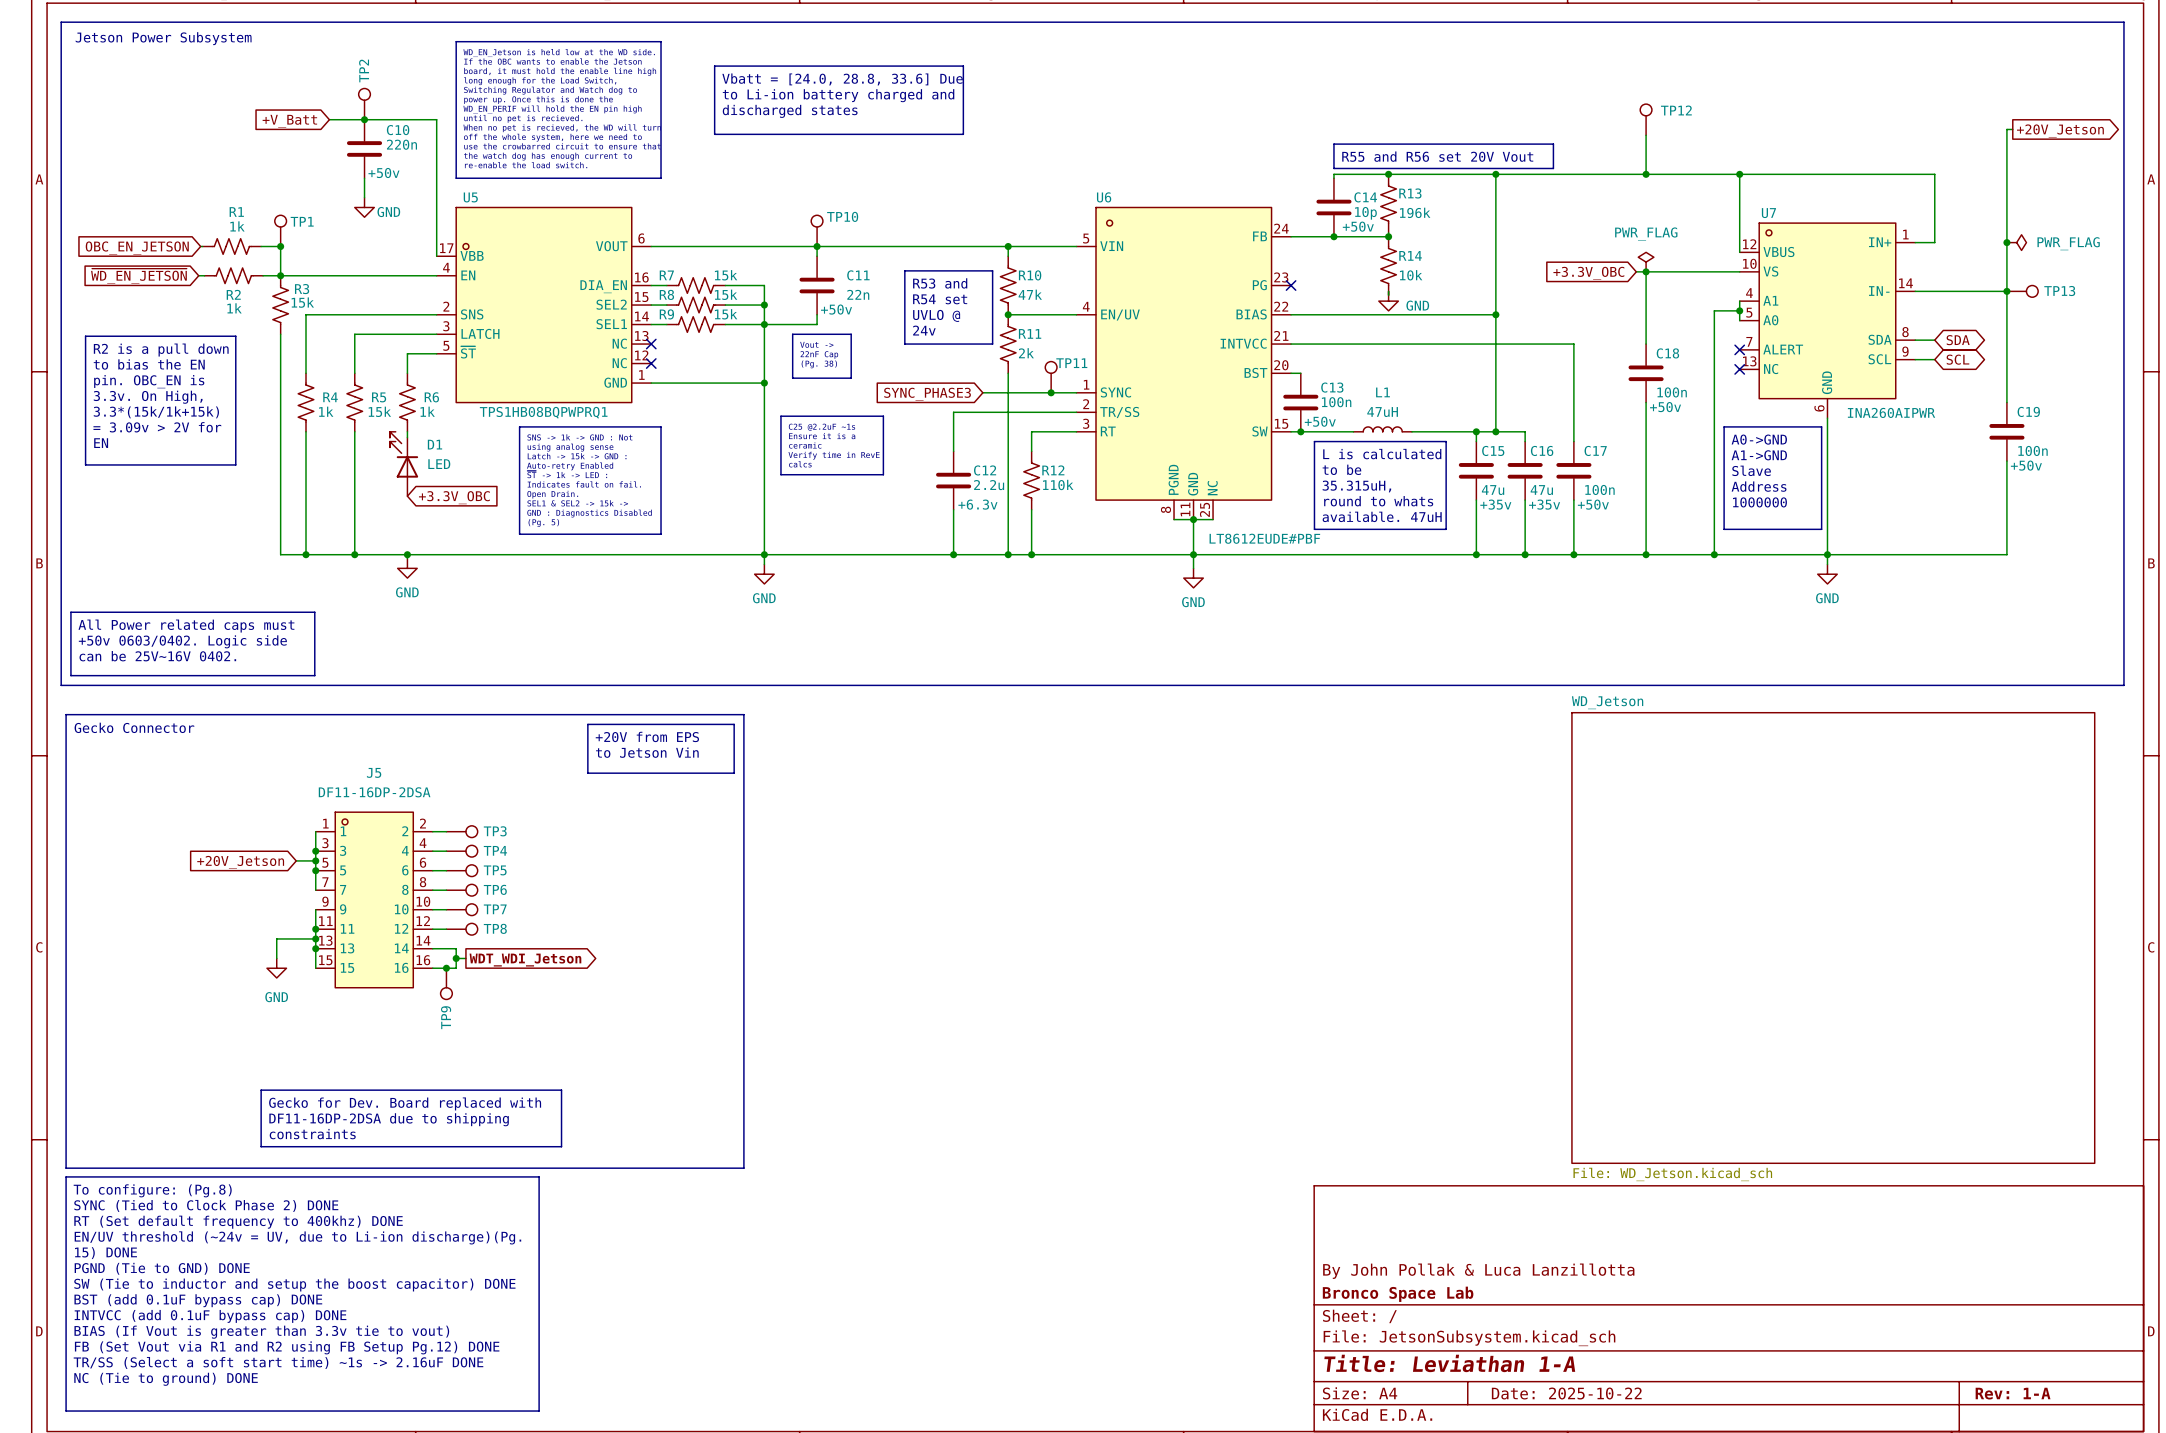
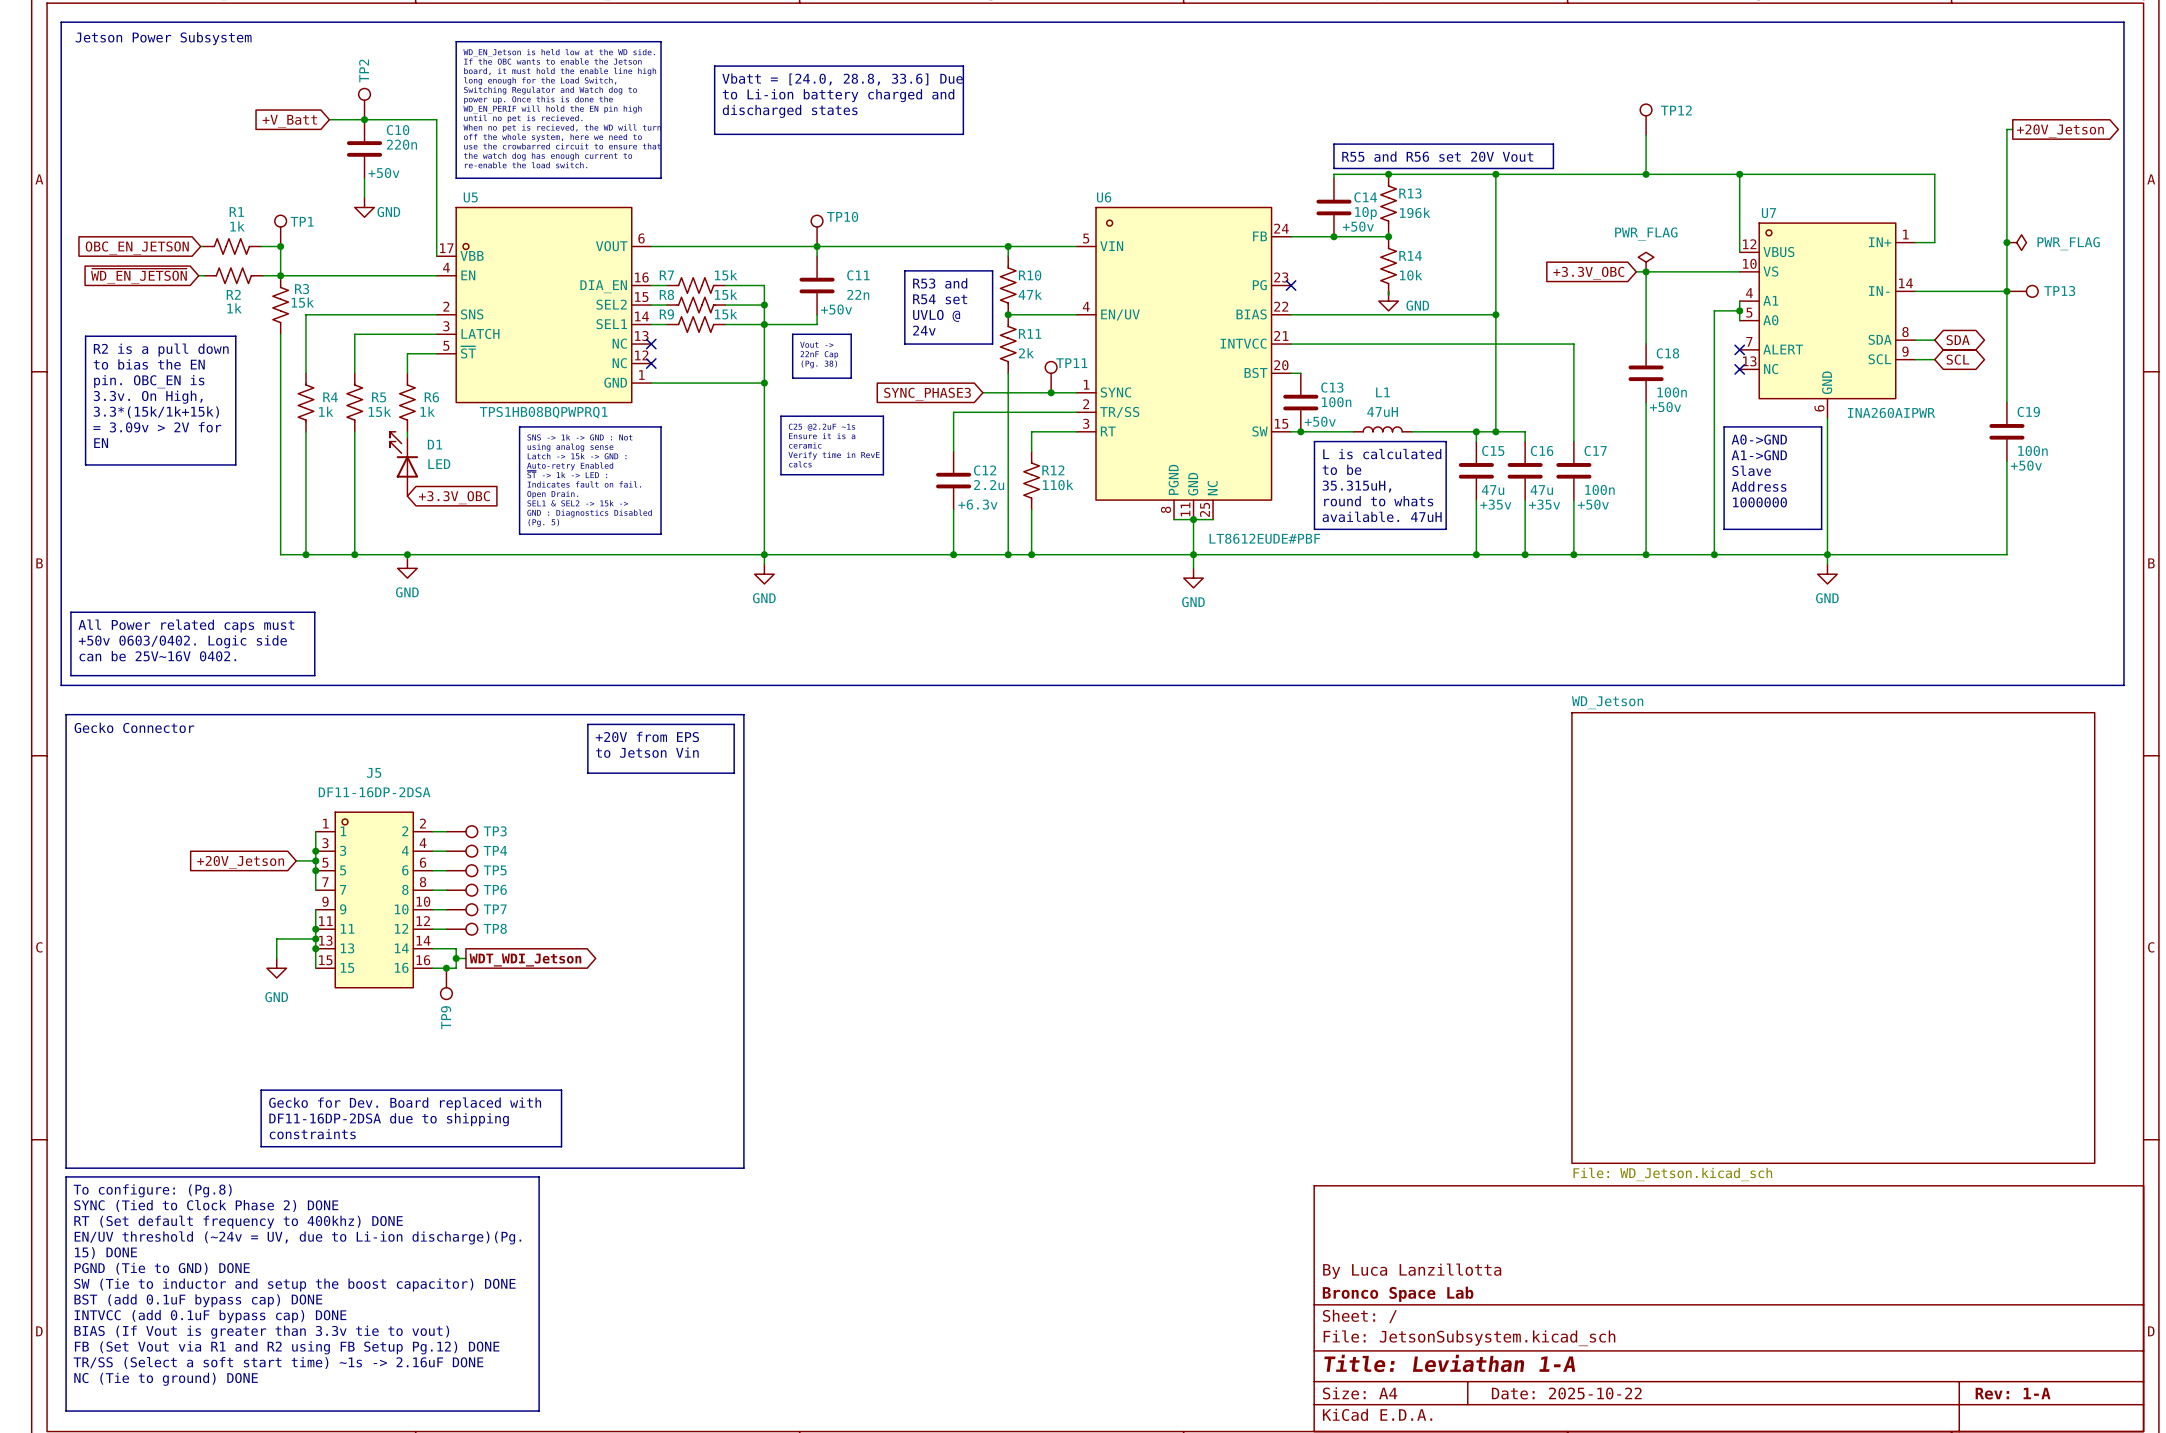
title block: By John Pollak & Luca Lanzillotta (1478, 1271) -> By Luca Lanzillotta (1412, 1271)

